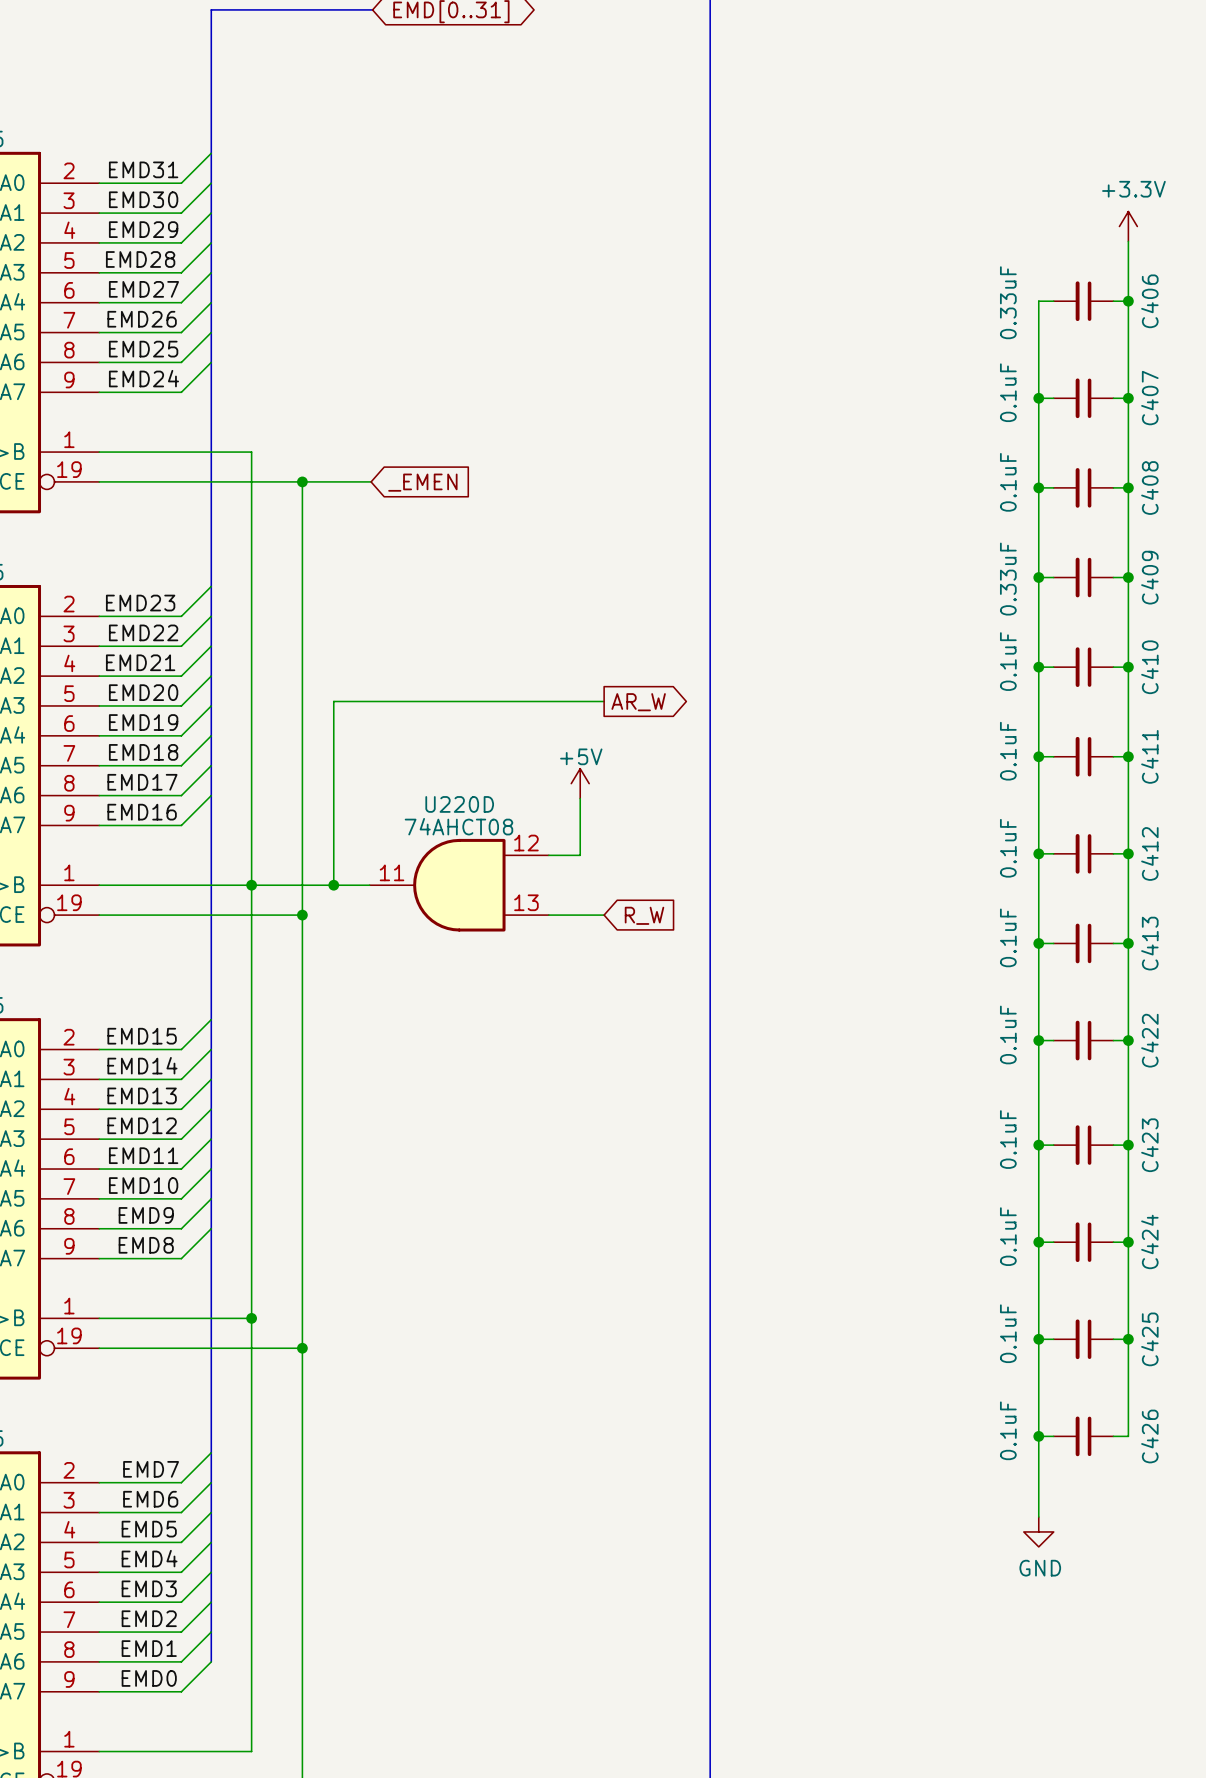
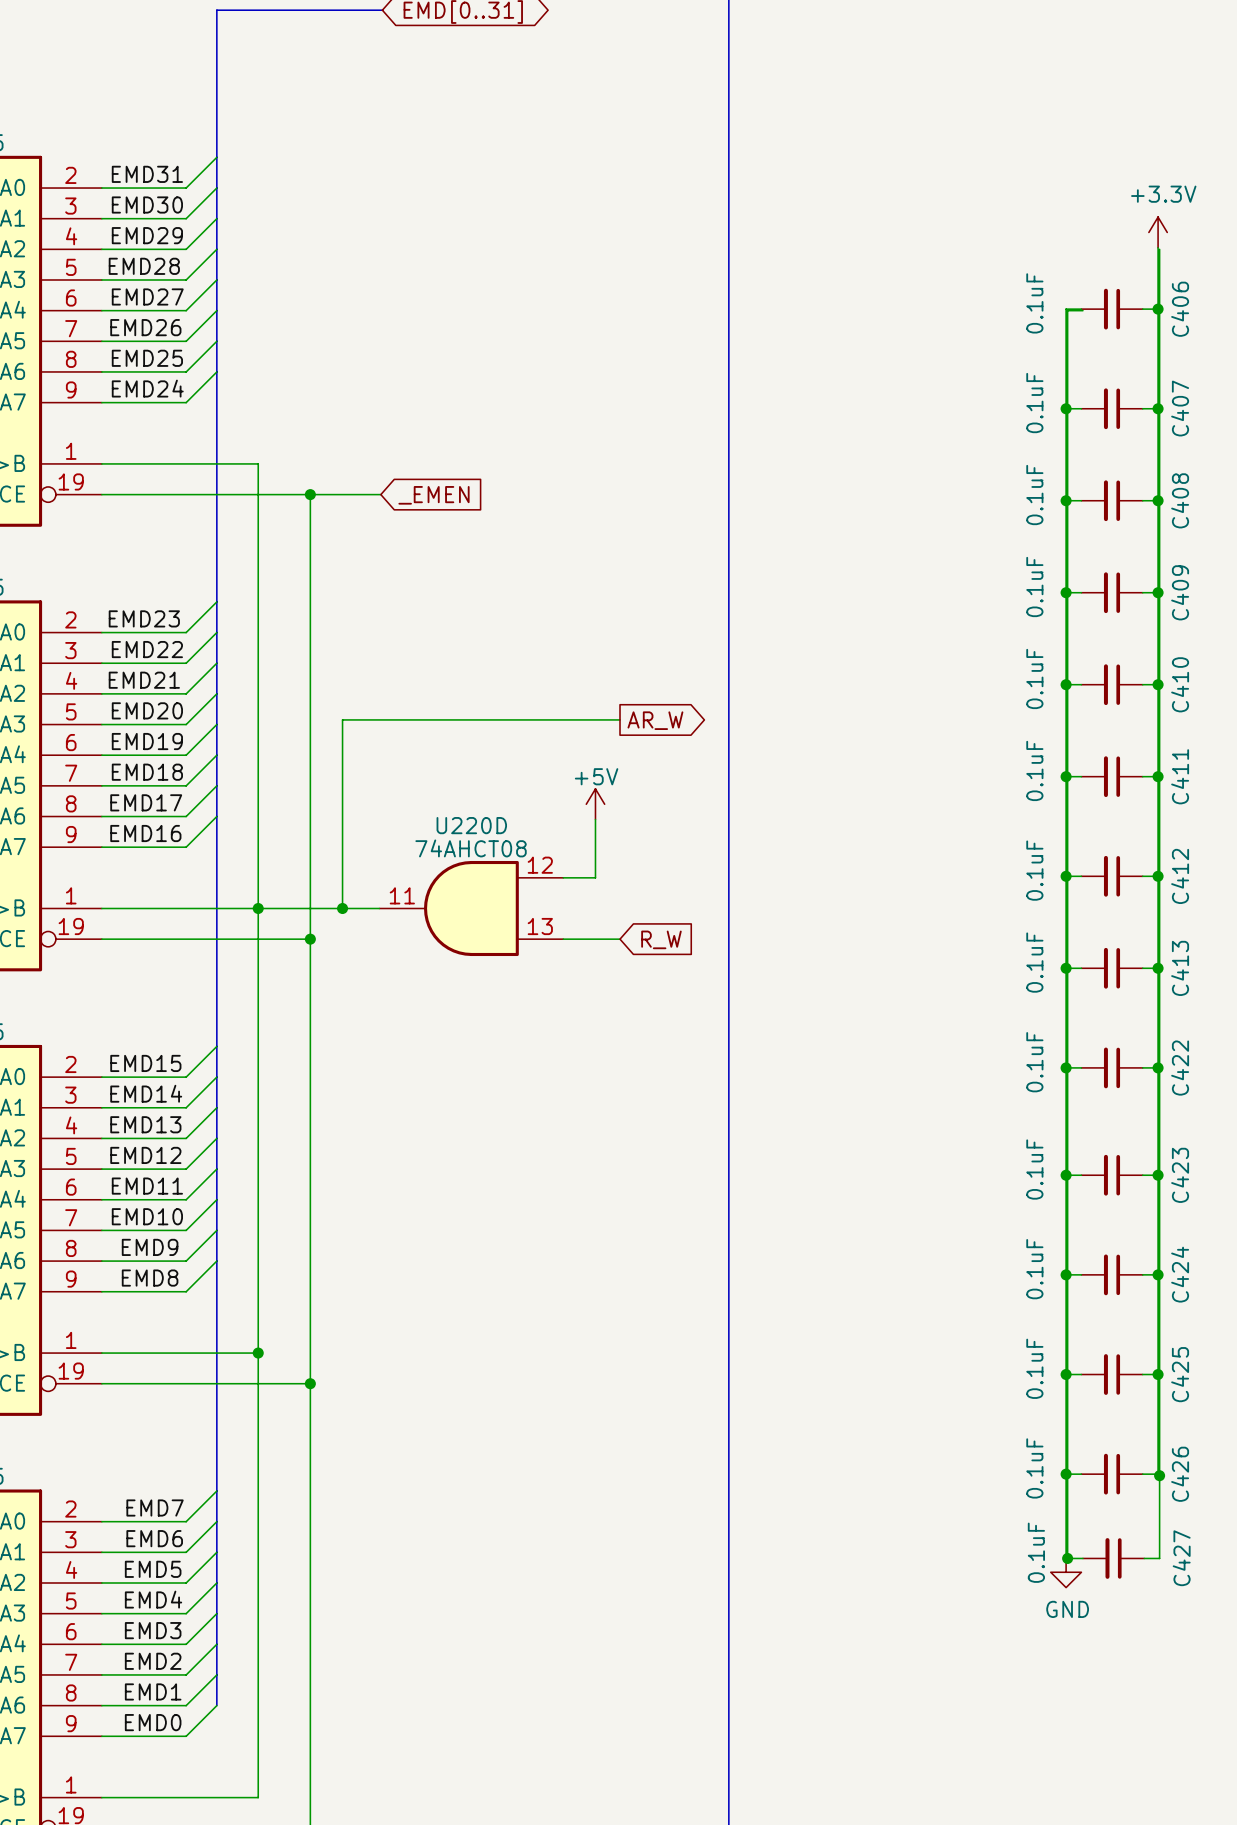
wire: none -> (1159, 249) (1159, 1558) (1144, 1558)
C406 value: 0.33uF (1008, 302) -> 0.1uF (1034, 303)
wire: none -> (1082, 310) (1067, 310) (1067, 1558) (1082, 1558)
C409 value: 0.33uF (1008, 579) -> 0.1uF (1034, 586)
junction: none -> (1159, 1475)
junction: none -> (1067, 1558)
C427: none -> 0.1uF (1113, 1558)

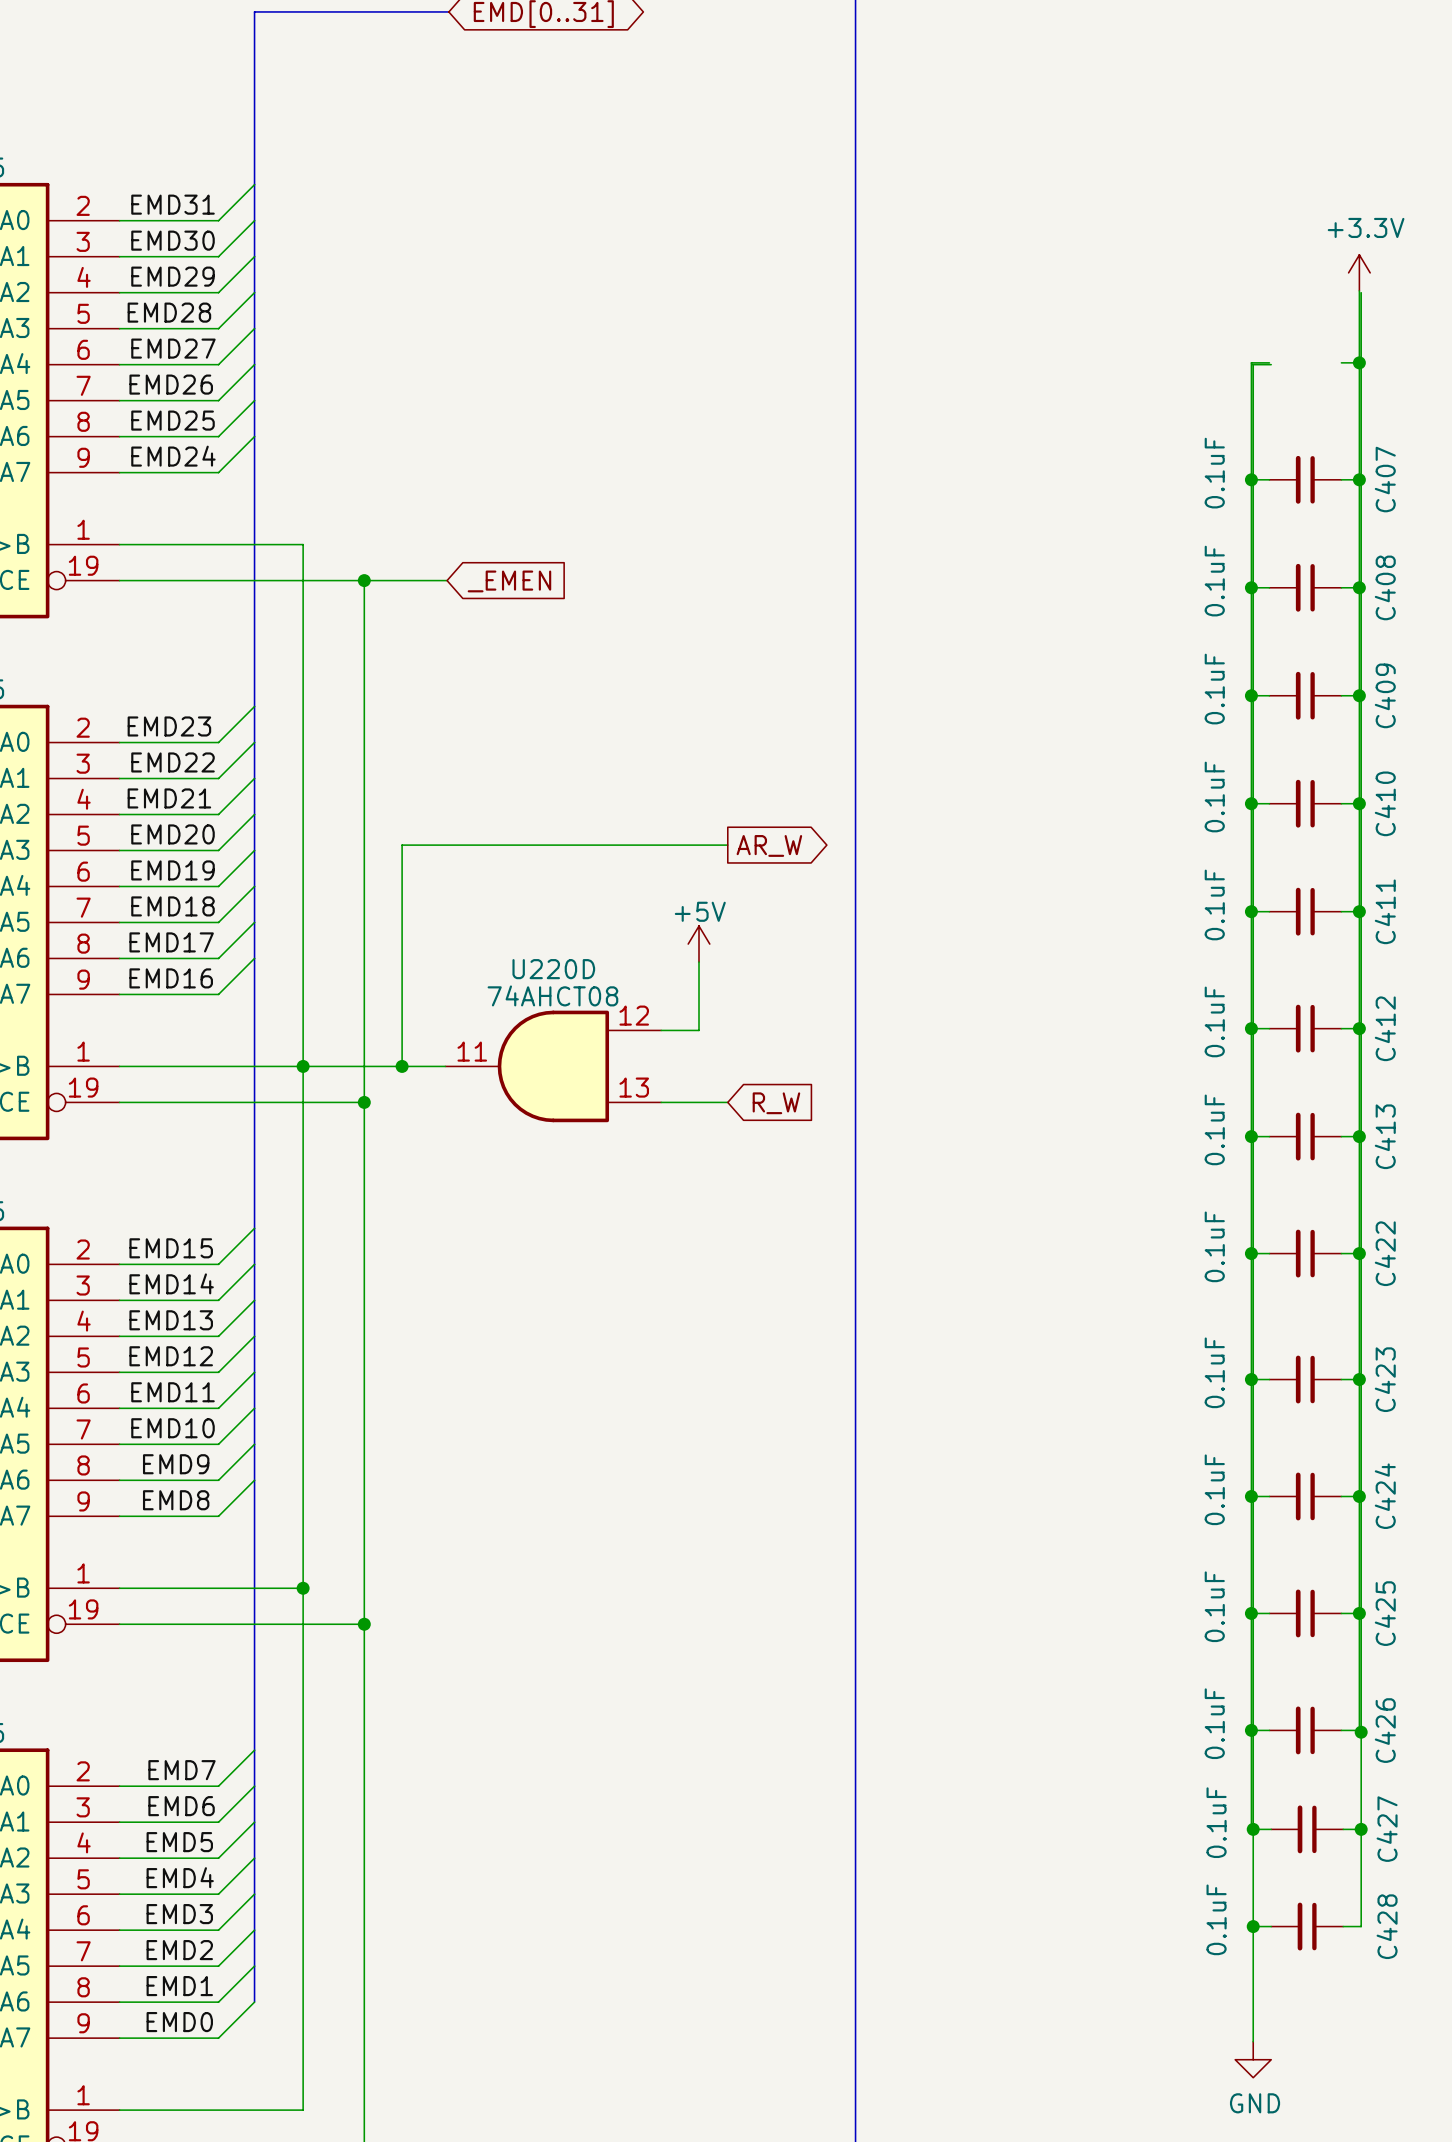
C406: 0.1uF (1112, 309) -> none
wire: none -> (1253, 1829) (1253, 2041)
wire: none -> (1361, 1829) (1361, 1926) (1343, 1926)
junction: none -> (1361, 1829)
power symbol position: GND (1066, 1572) -> GND (1253, 2059)
wire: none -> (1253, 1926) (1271, 1926)
junction: none -> (1253, 1926)
C428: none -> 0.1uF (1307, 1926)

